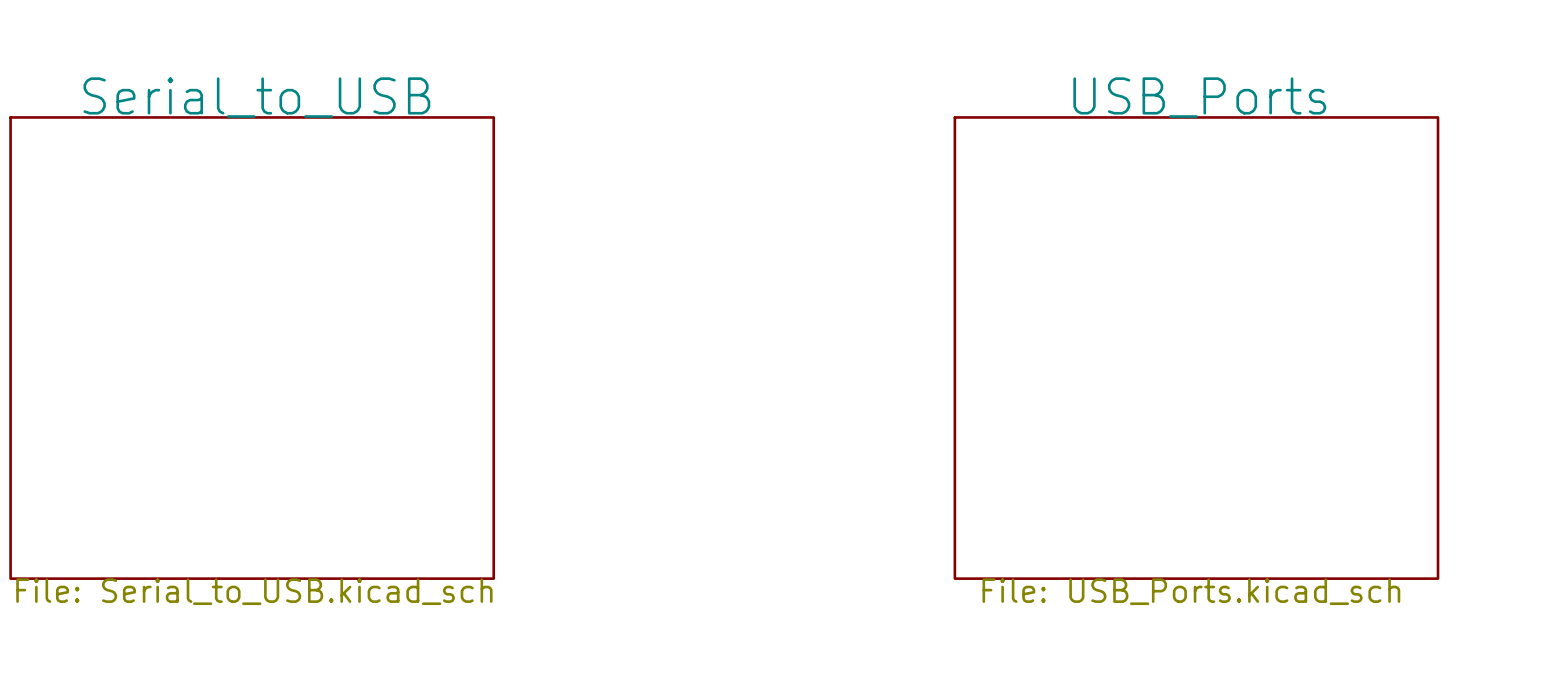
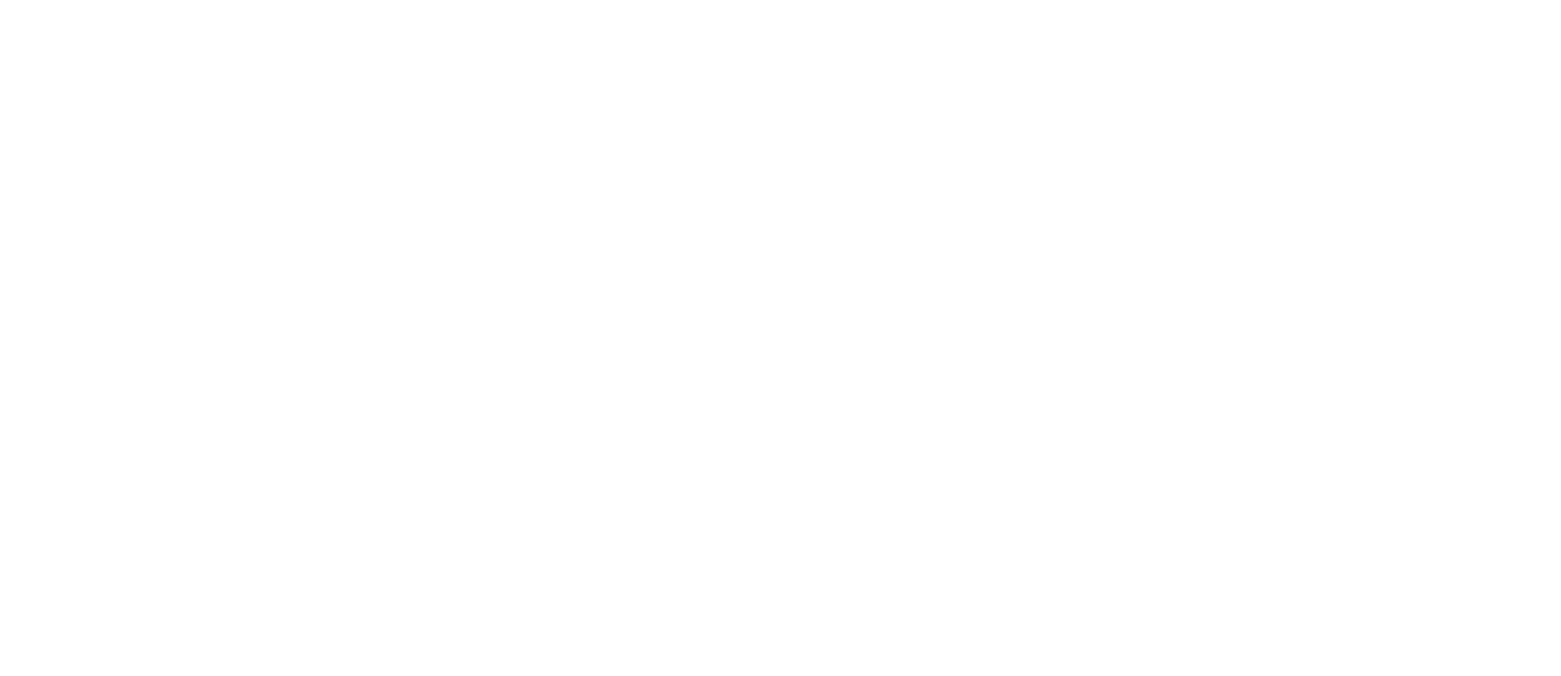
sheet Serial_to_USB: File: Serial_to_USB.kicad_sch (252, 348) -> none
sheet USB_Ports: File: USB_Ports.kicad_sch (1196, 348) -> none

